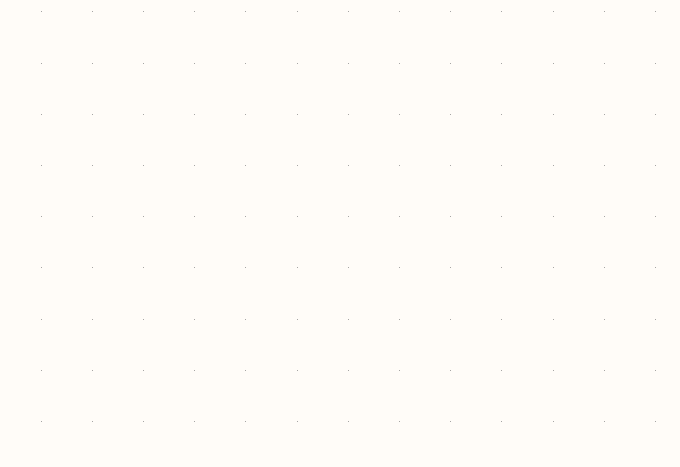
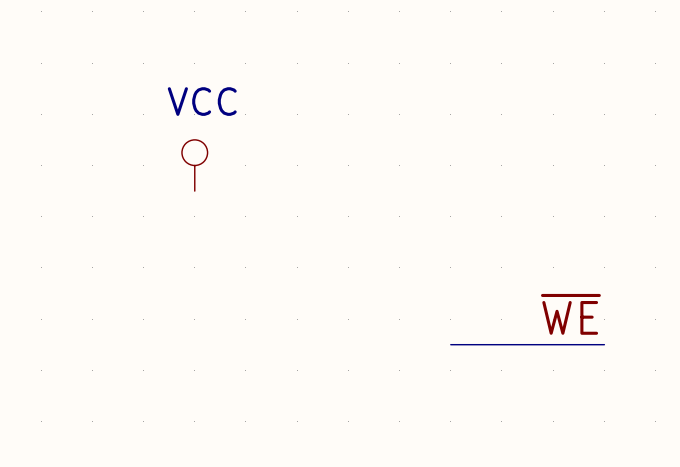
power symbol: none -> VCC (194, 165)
label: none -> ~{WE} (570, 314)
wire: none -> (450, 344) (604, 344)

